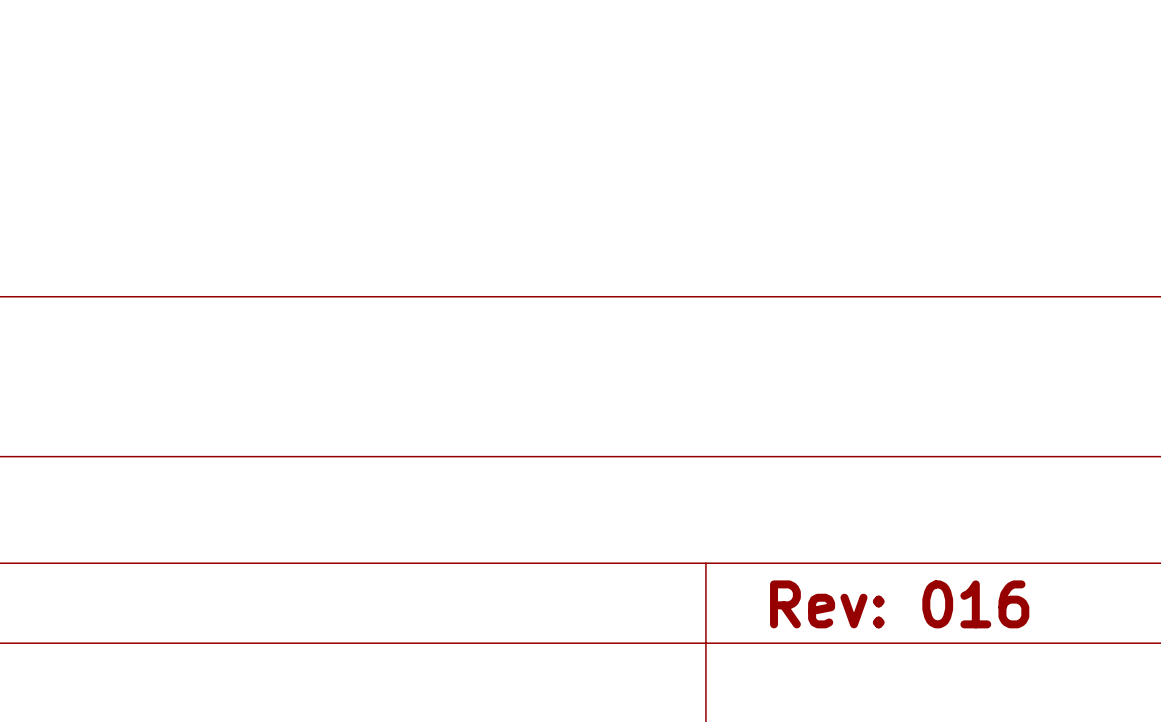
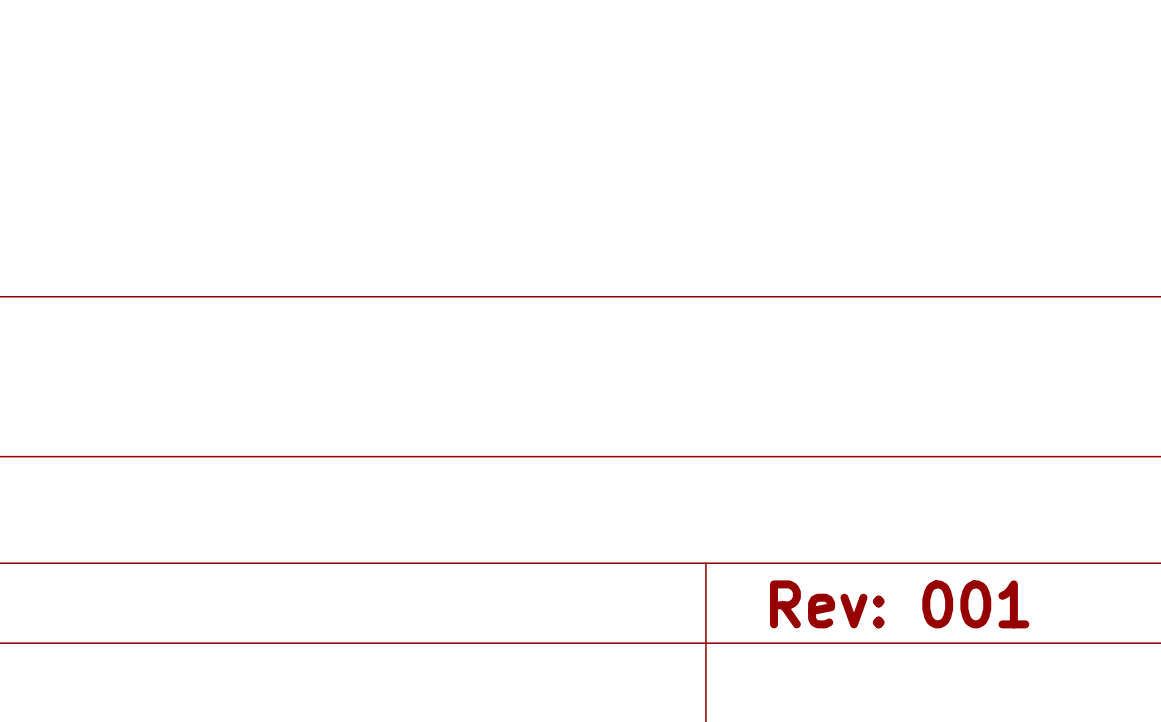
title block: Rev: 016 (899, 604) -> Rev: 001 (899, 604)

